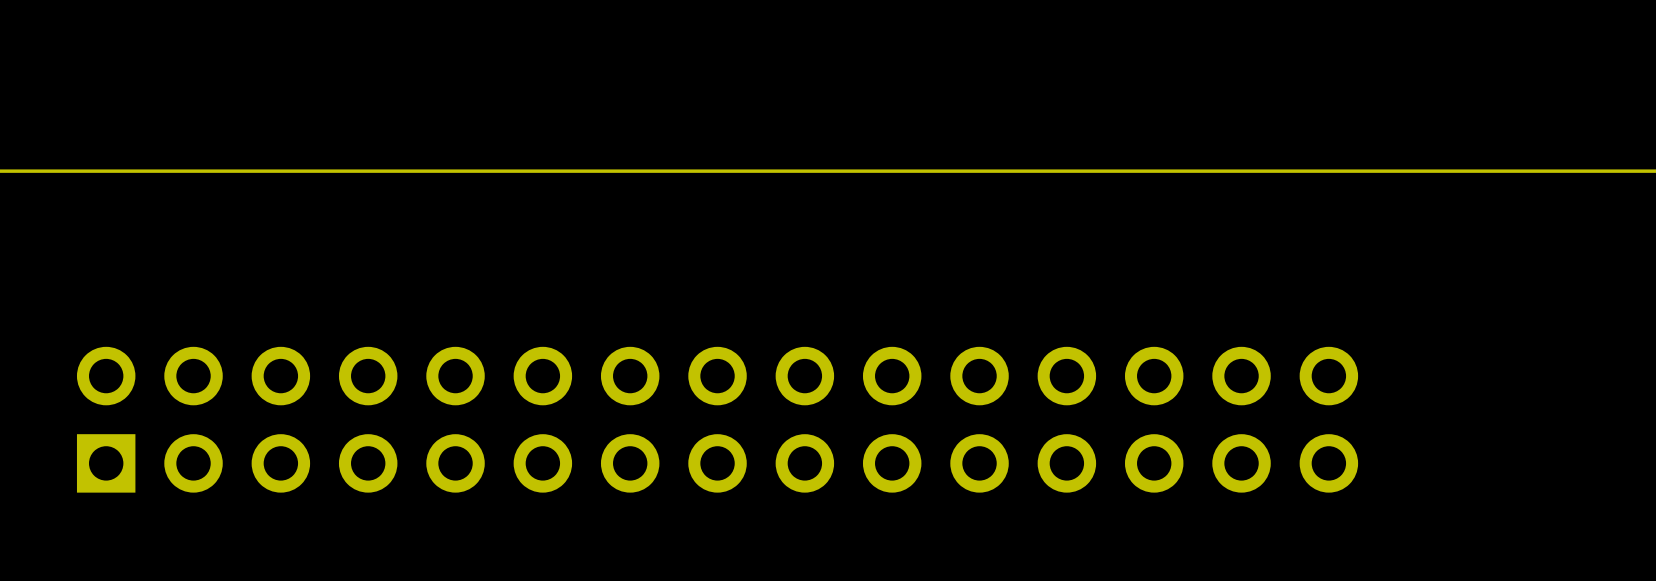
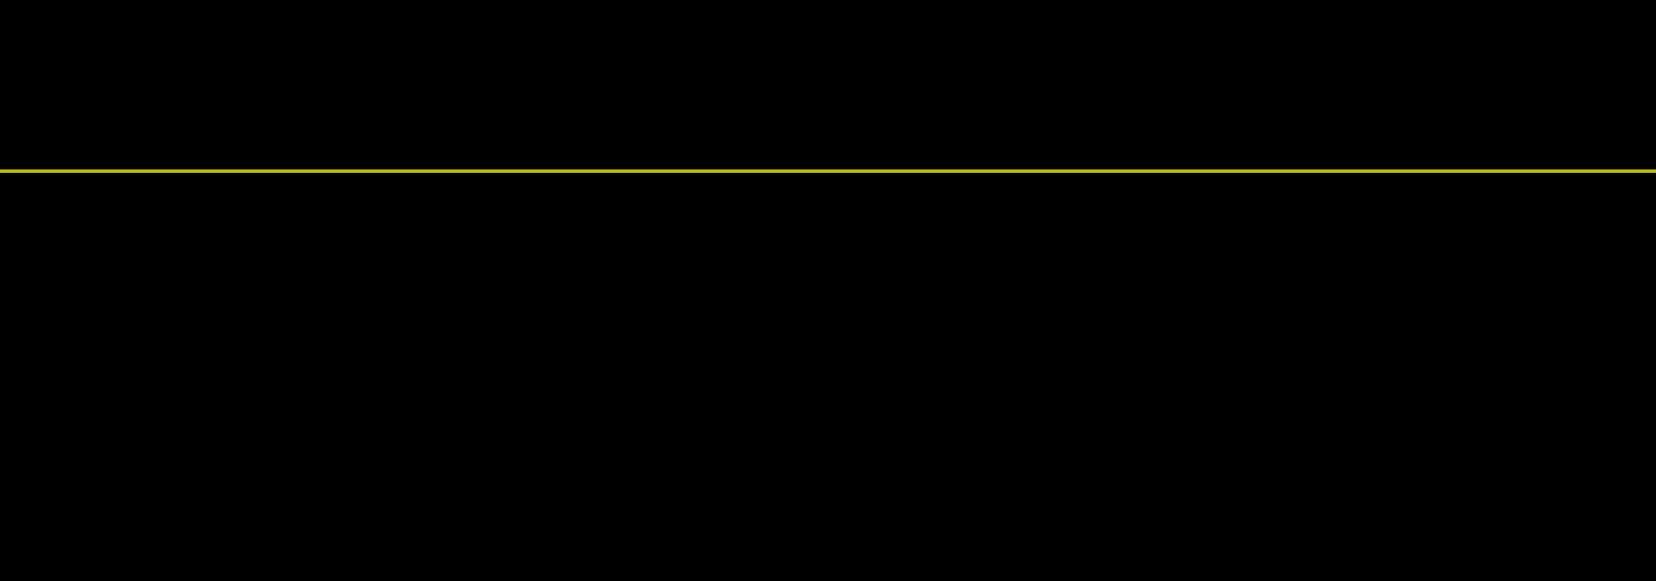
part: (717, 419) -> none

